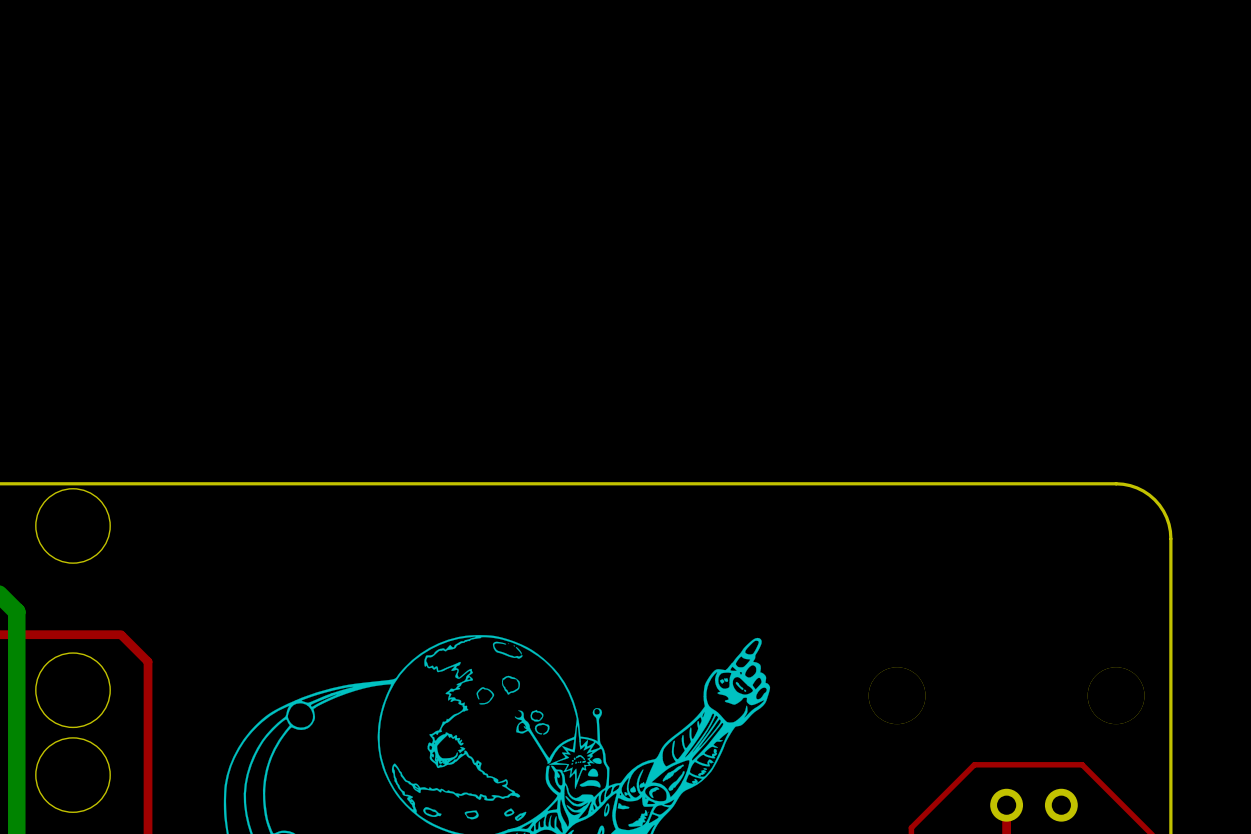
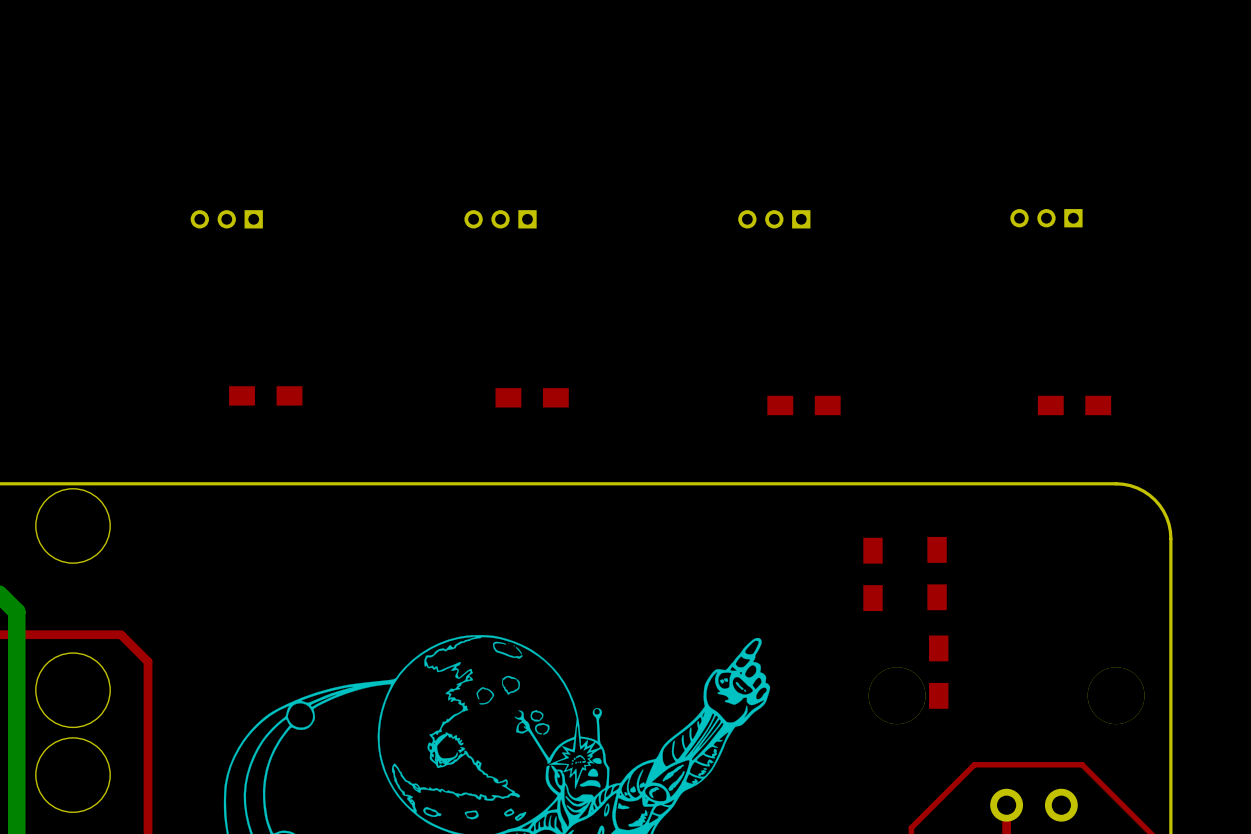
part: none -> (1046, 218)
part: none -> (226, 219)
part: none -> (500, 219)
part: none -> (774, 219)
part: none -> (265, 395)
part: none -> (532, 397)
part: none -> (804, 405)
part: none -> (1074, 405)
part: none -> (937, 573)
part: none -> (873, 574)
part: none -> (938, 672)

